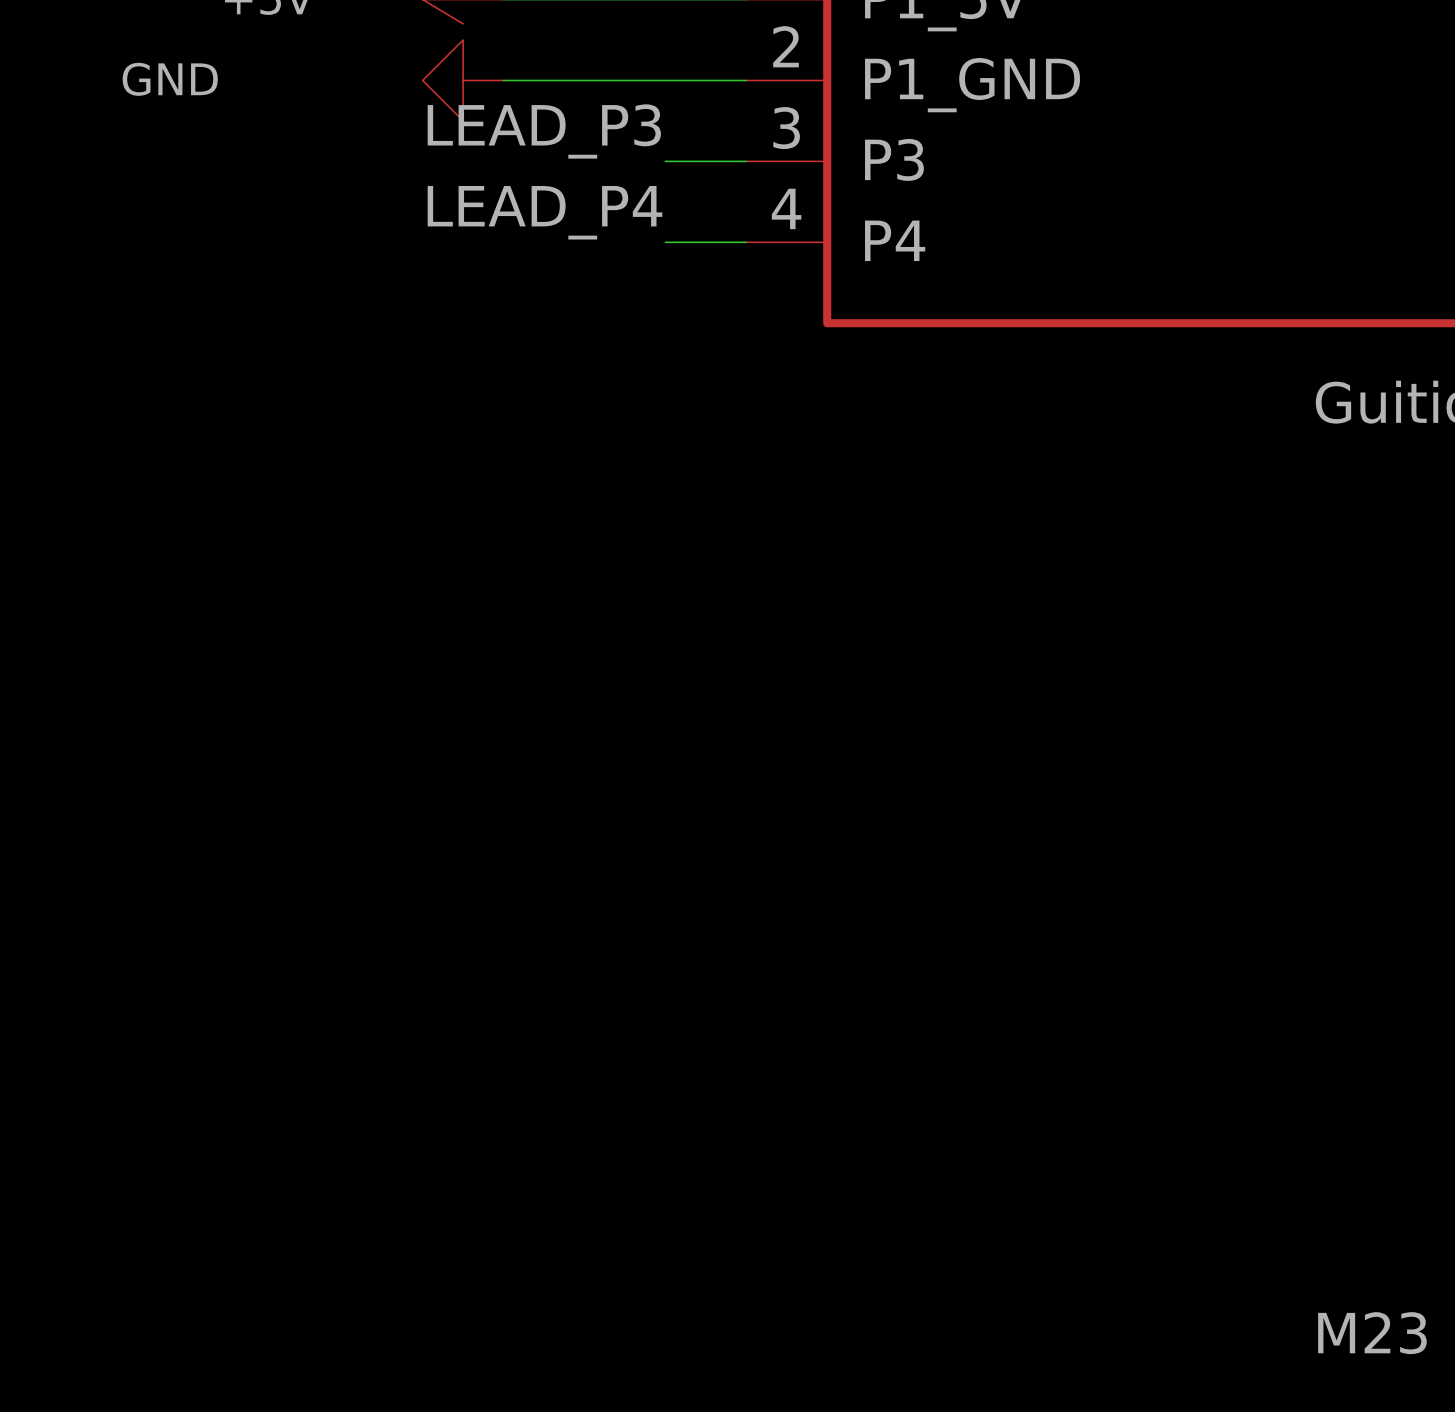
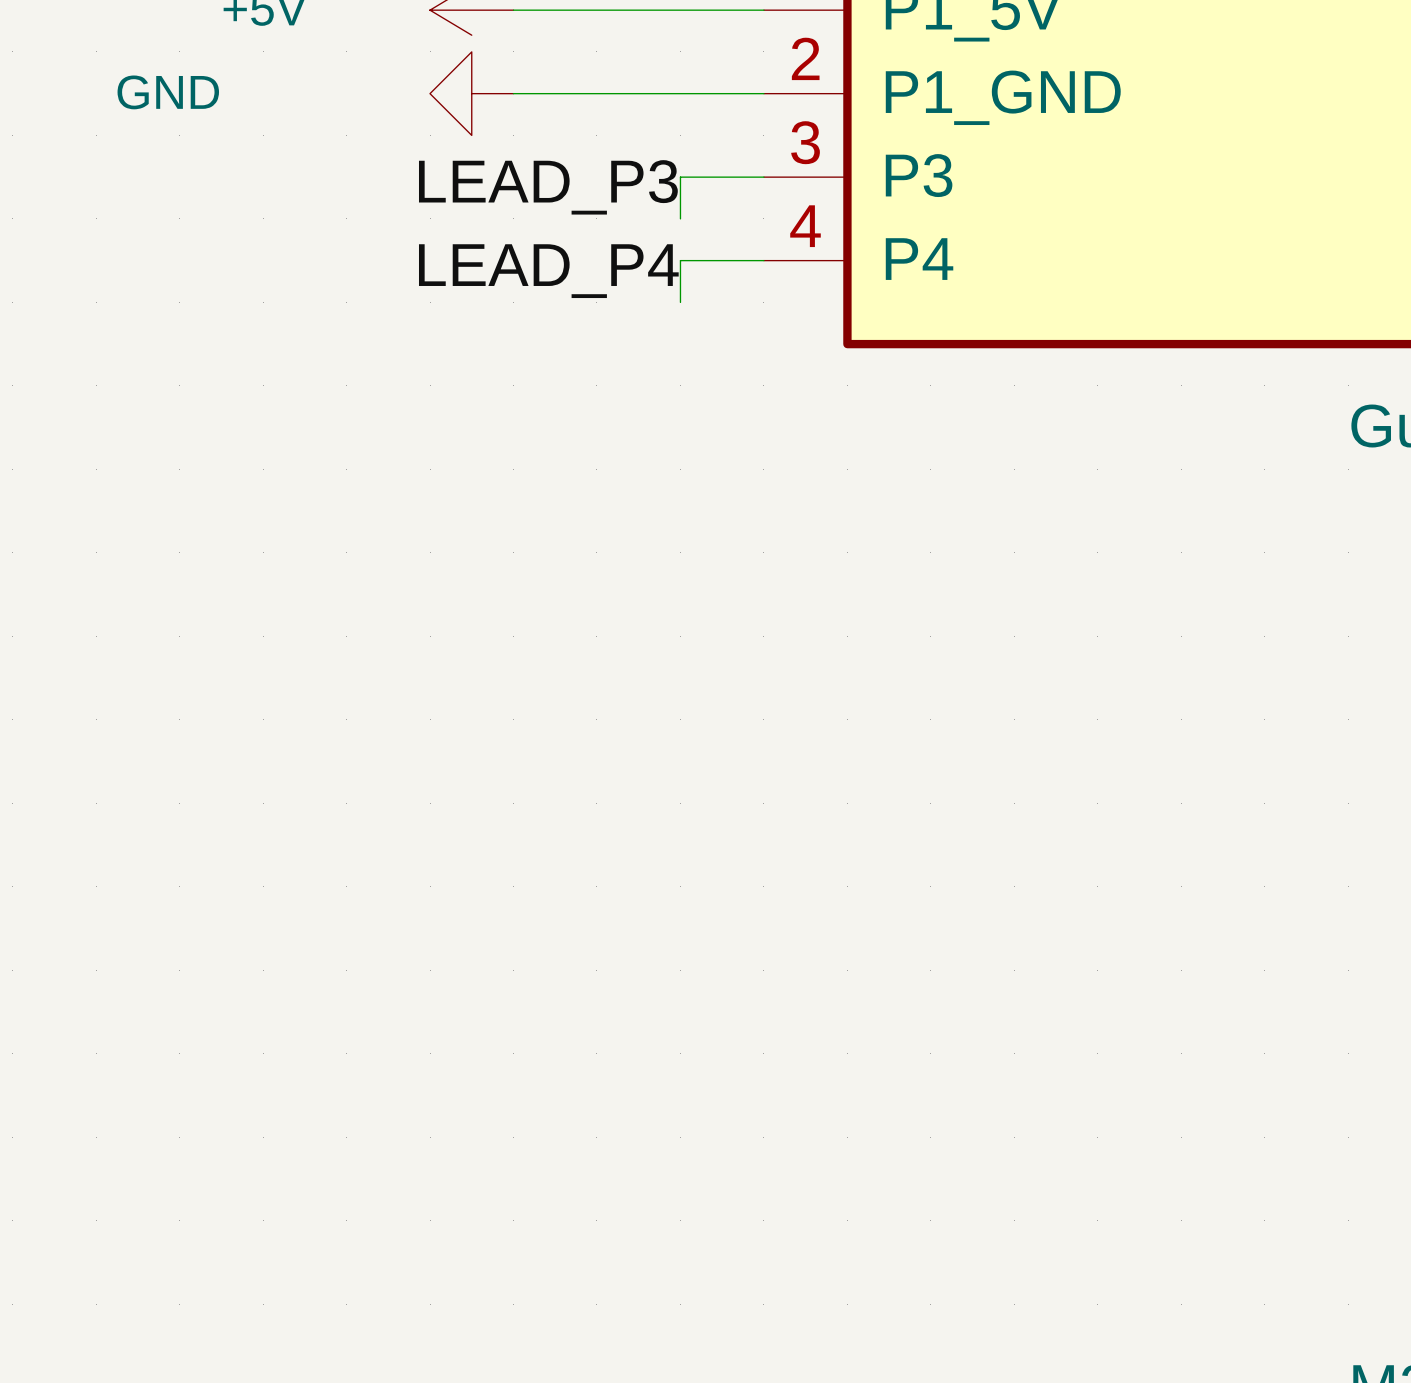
label position: LEAD_P3 (544, 131) -> LEAD_P3 (548, 187)
wire: none -> (680, 177) (680, 218)
label position: LEAD_P4 (544, 212) -> LEAD_P4 (548, 271)
wire: none -> (680, 260) (680, 302)

